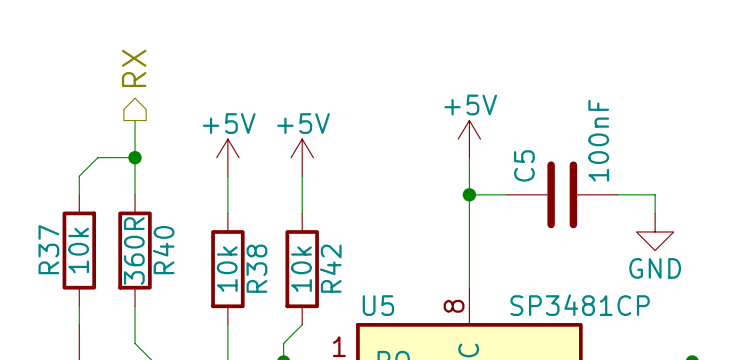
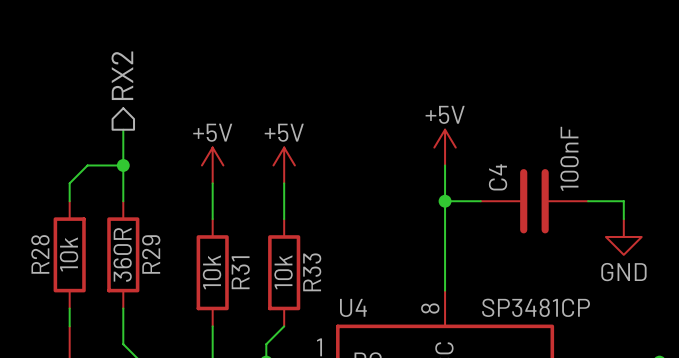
hierarchical label: RX (134, 68) -> RX2 (122, 75)
C5 name: C5 (524, 165) -> C4 (498, 177)
R37 name: R37 (48, 249) -> R28 (40, 254)
R40 name: R40 (163, 250) -> R29 (151, 254)
R38 name: R38 (256, 268) -> R31 (240, 272)
R42 name: R42 (330, 268) -> R33 (312, 272)
U5 name: U5 (378, 305) -> U4 (353, 307)

